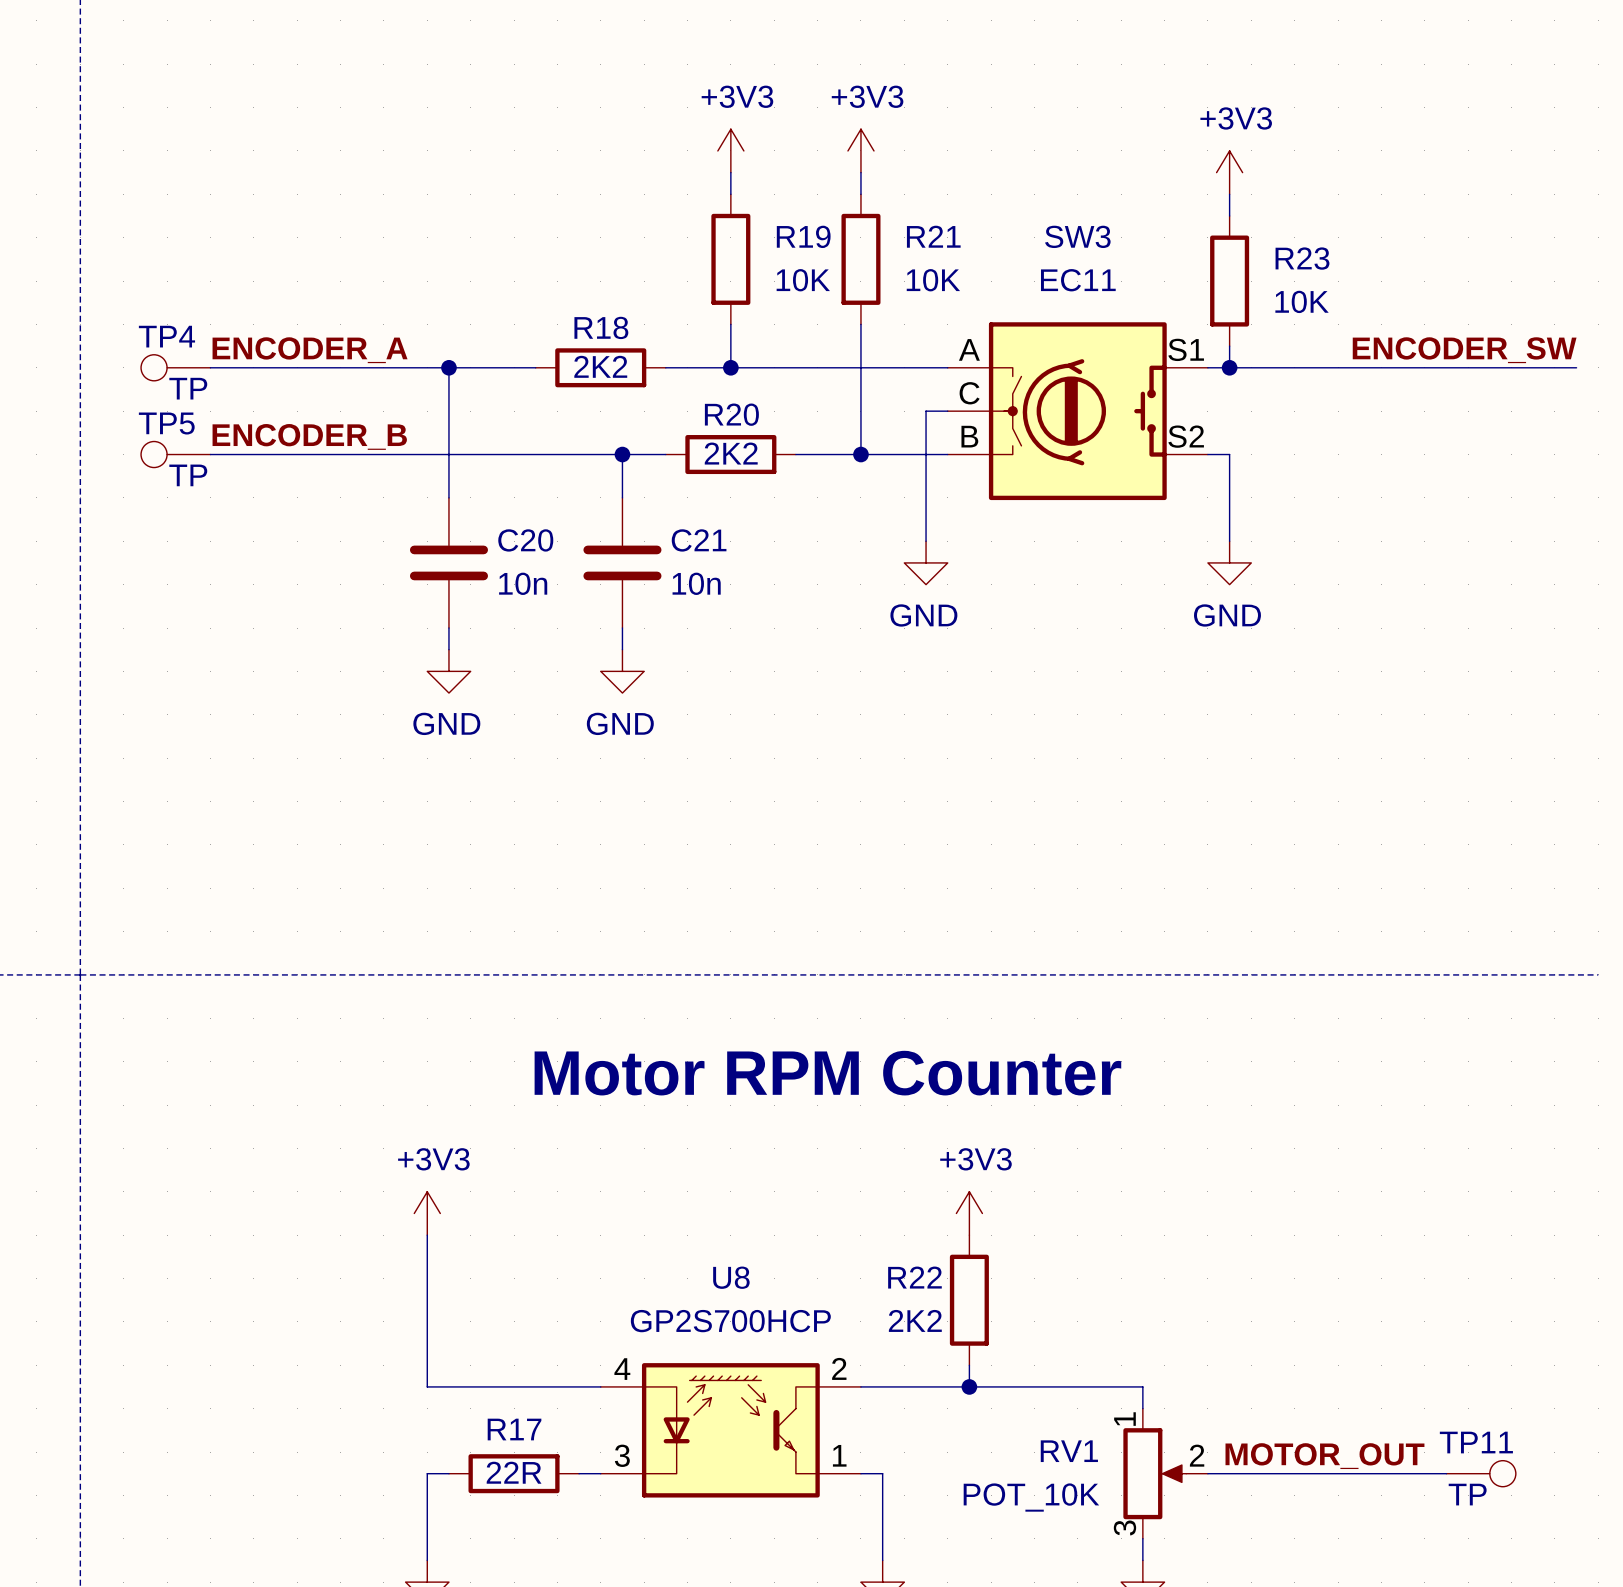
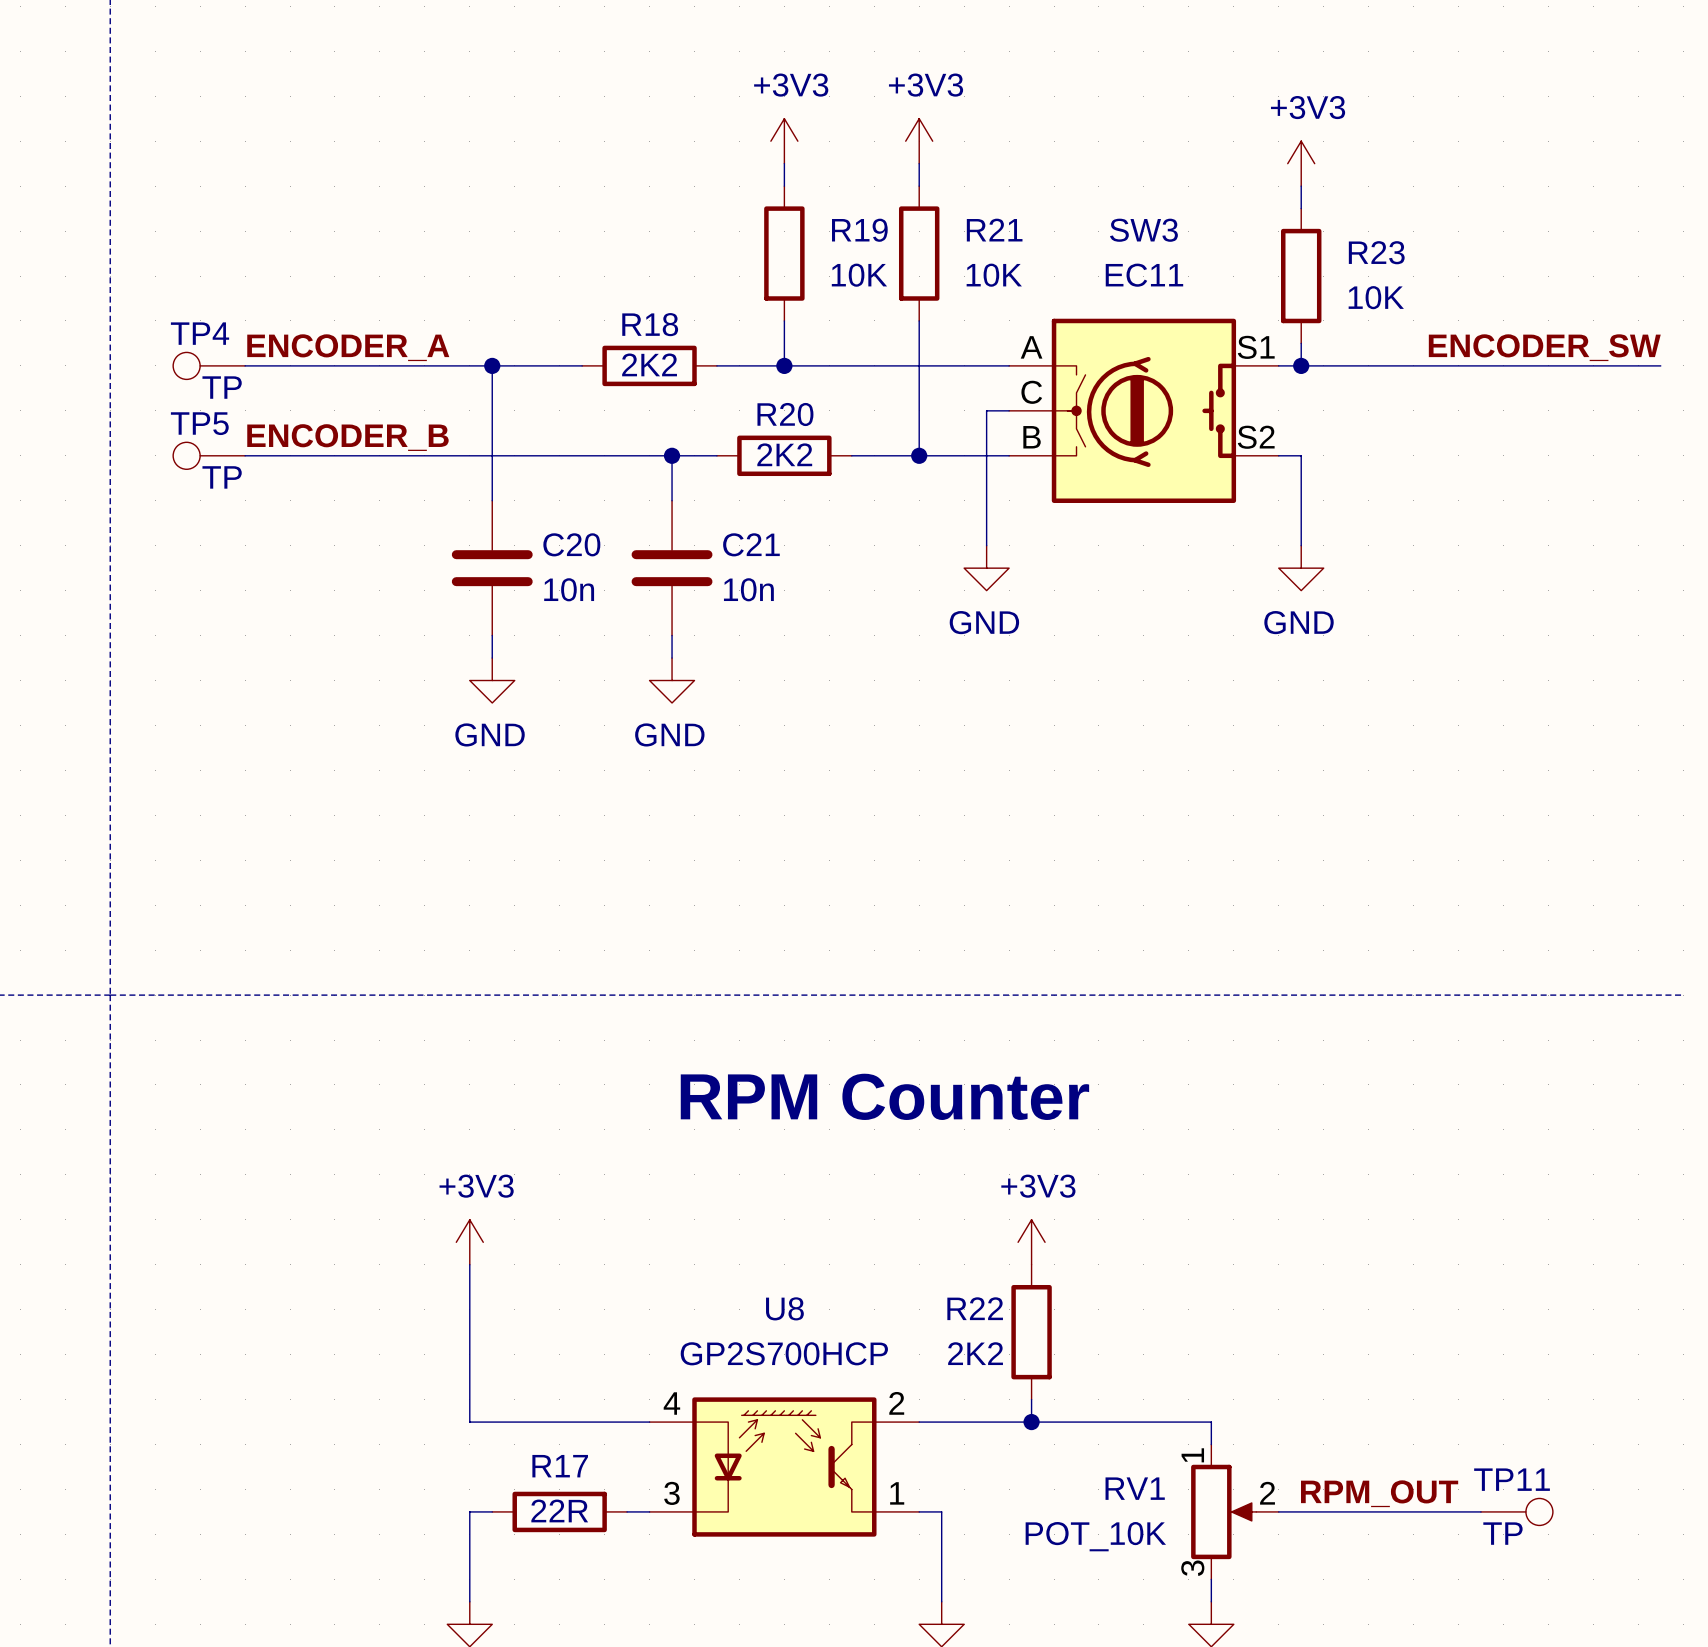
text: Motor RPM Counter (827, 1073) -> RPM Counter (884, 1096)
label: MOTOR_OUT (1324, 1456) -> RPM_OUT (1379, 1493)
TP11 position: (1481, 1473) -> (1516, 1511)

